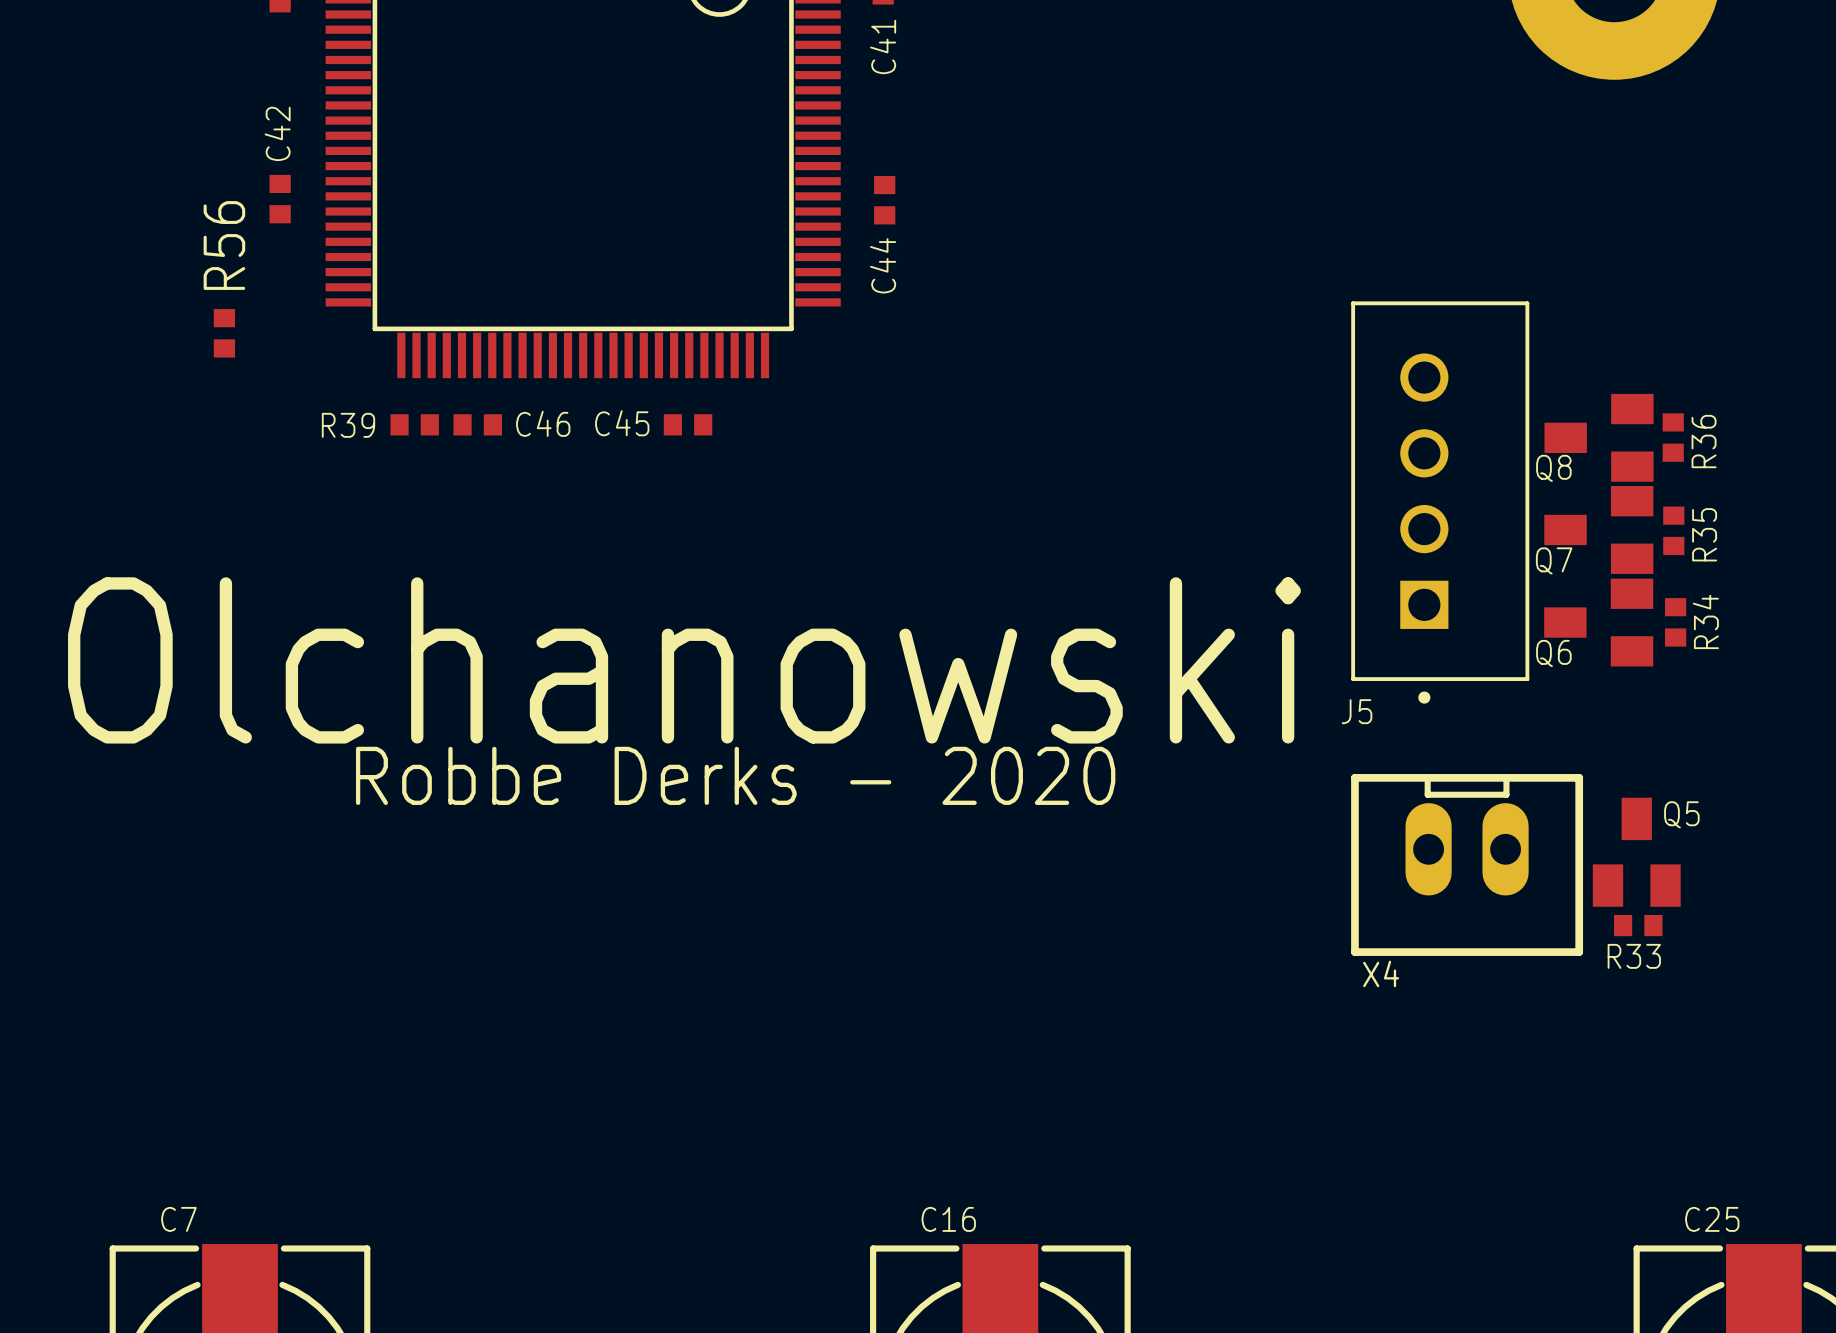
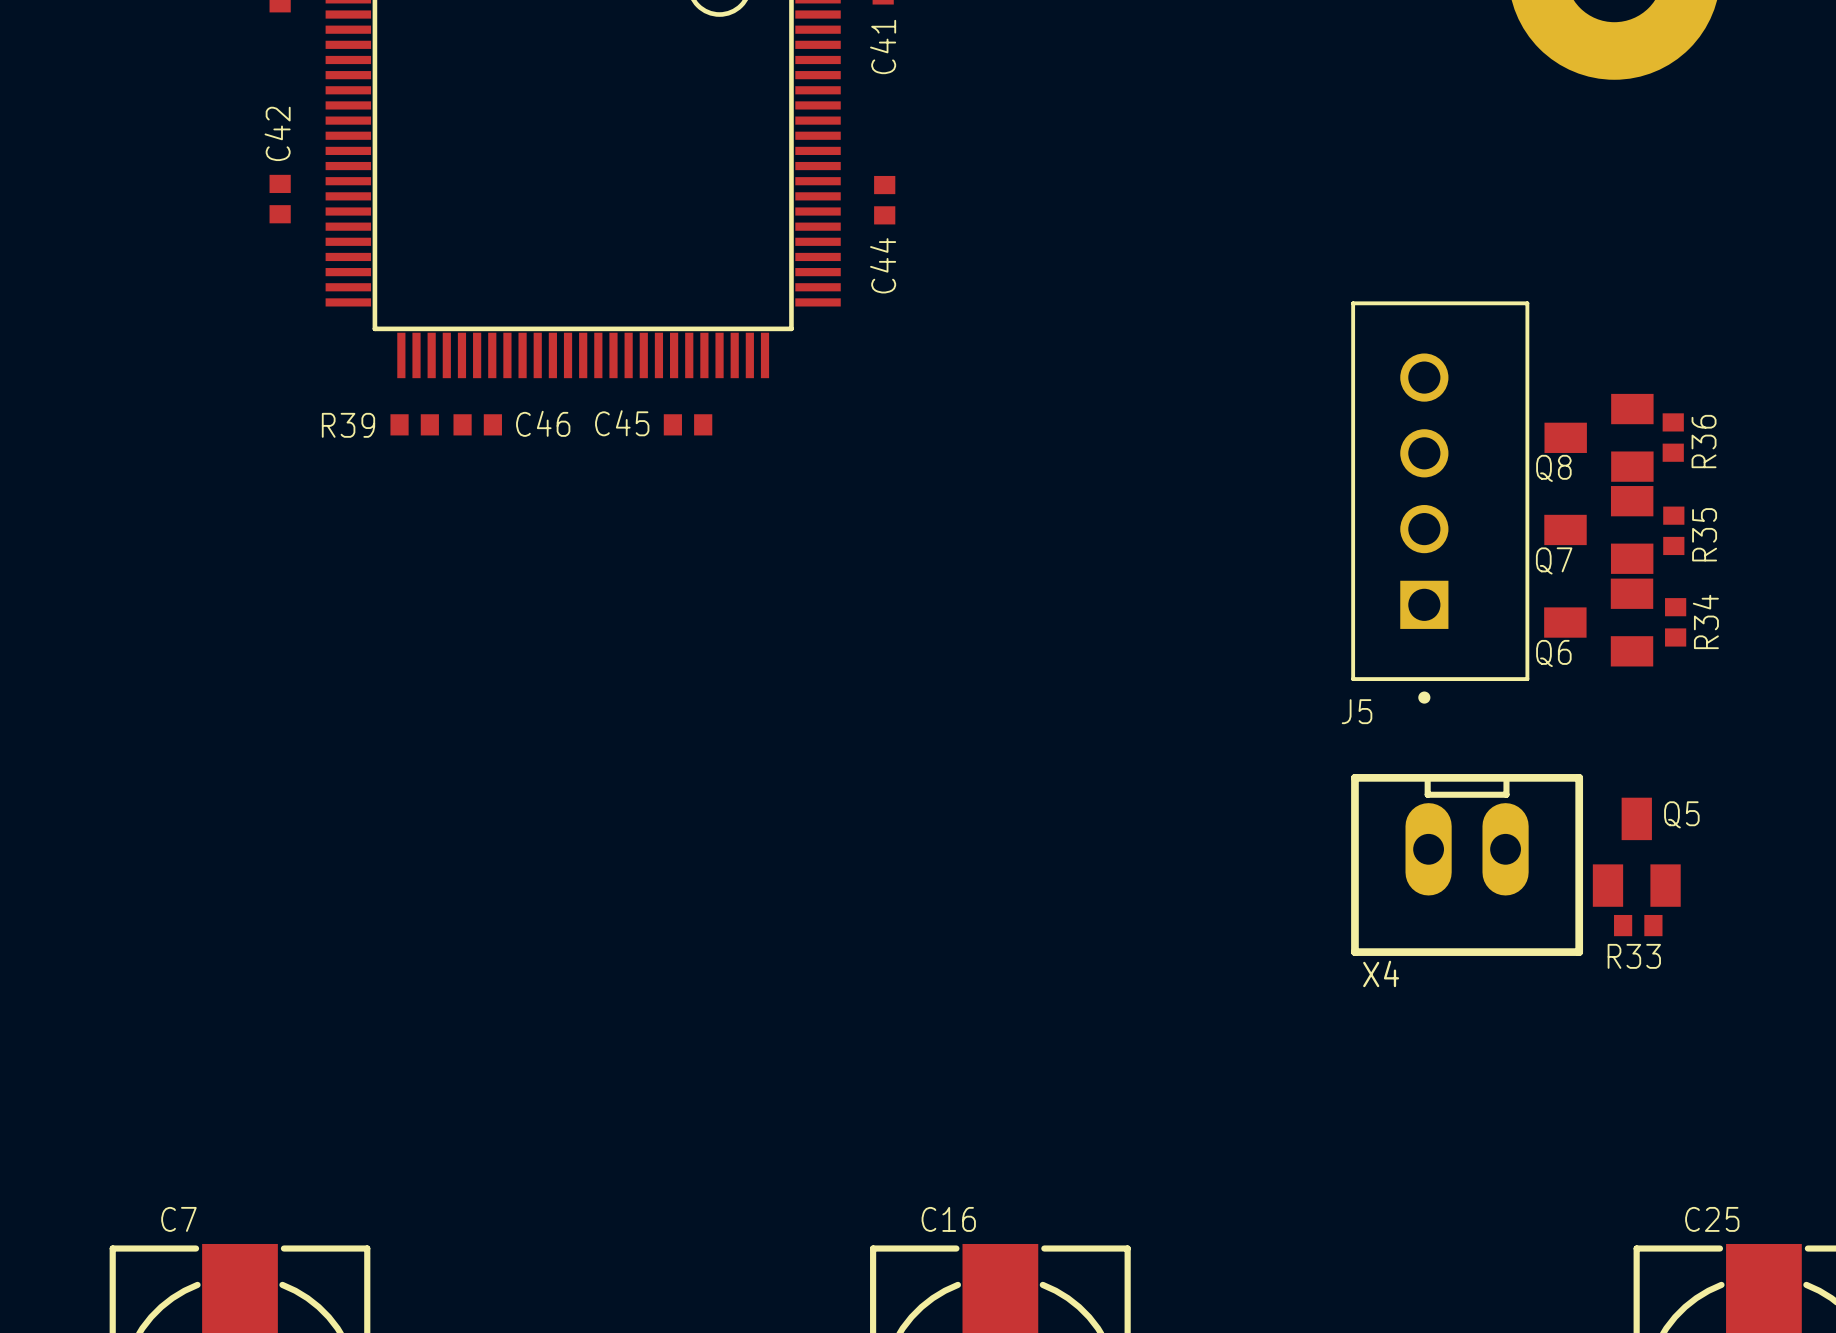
R56: (224, 333) -> none
text: Olchanowski (684, 660) -> none
text: Robbe Derks - 2020 (735, 775) -> none

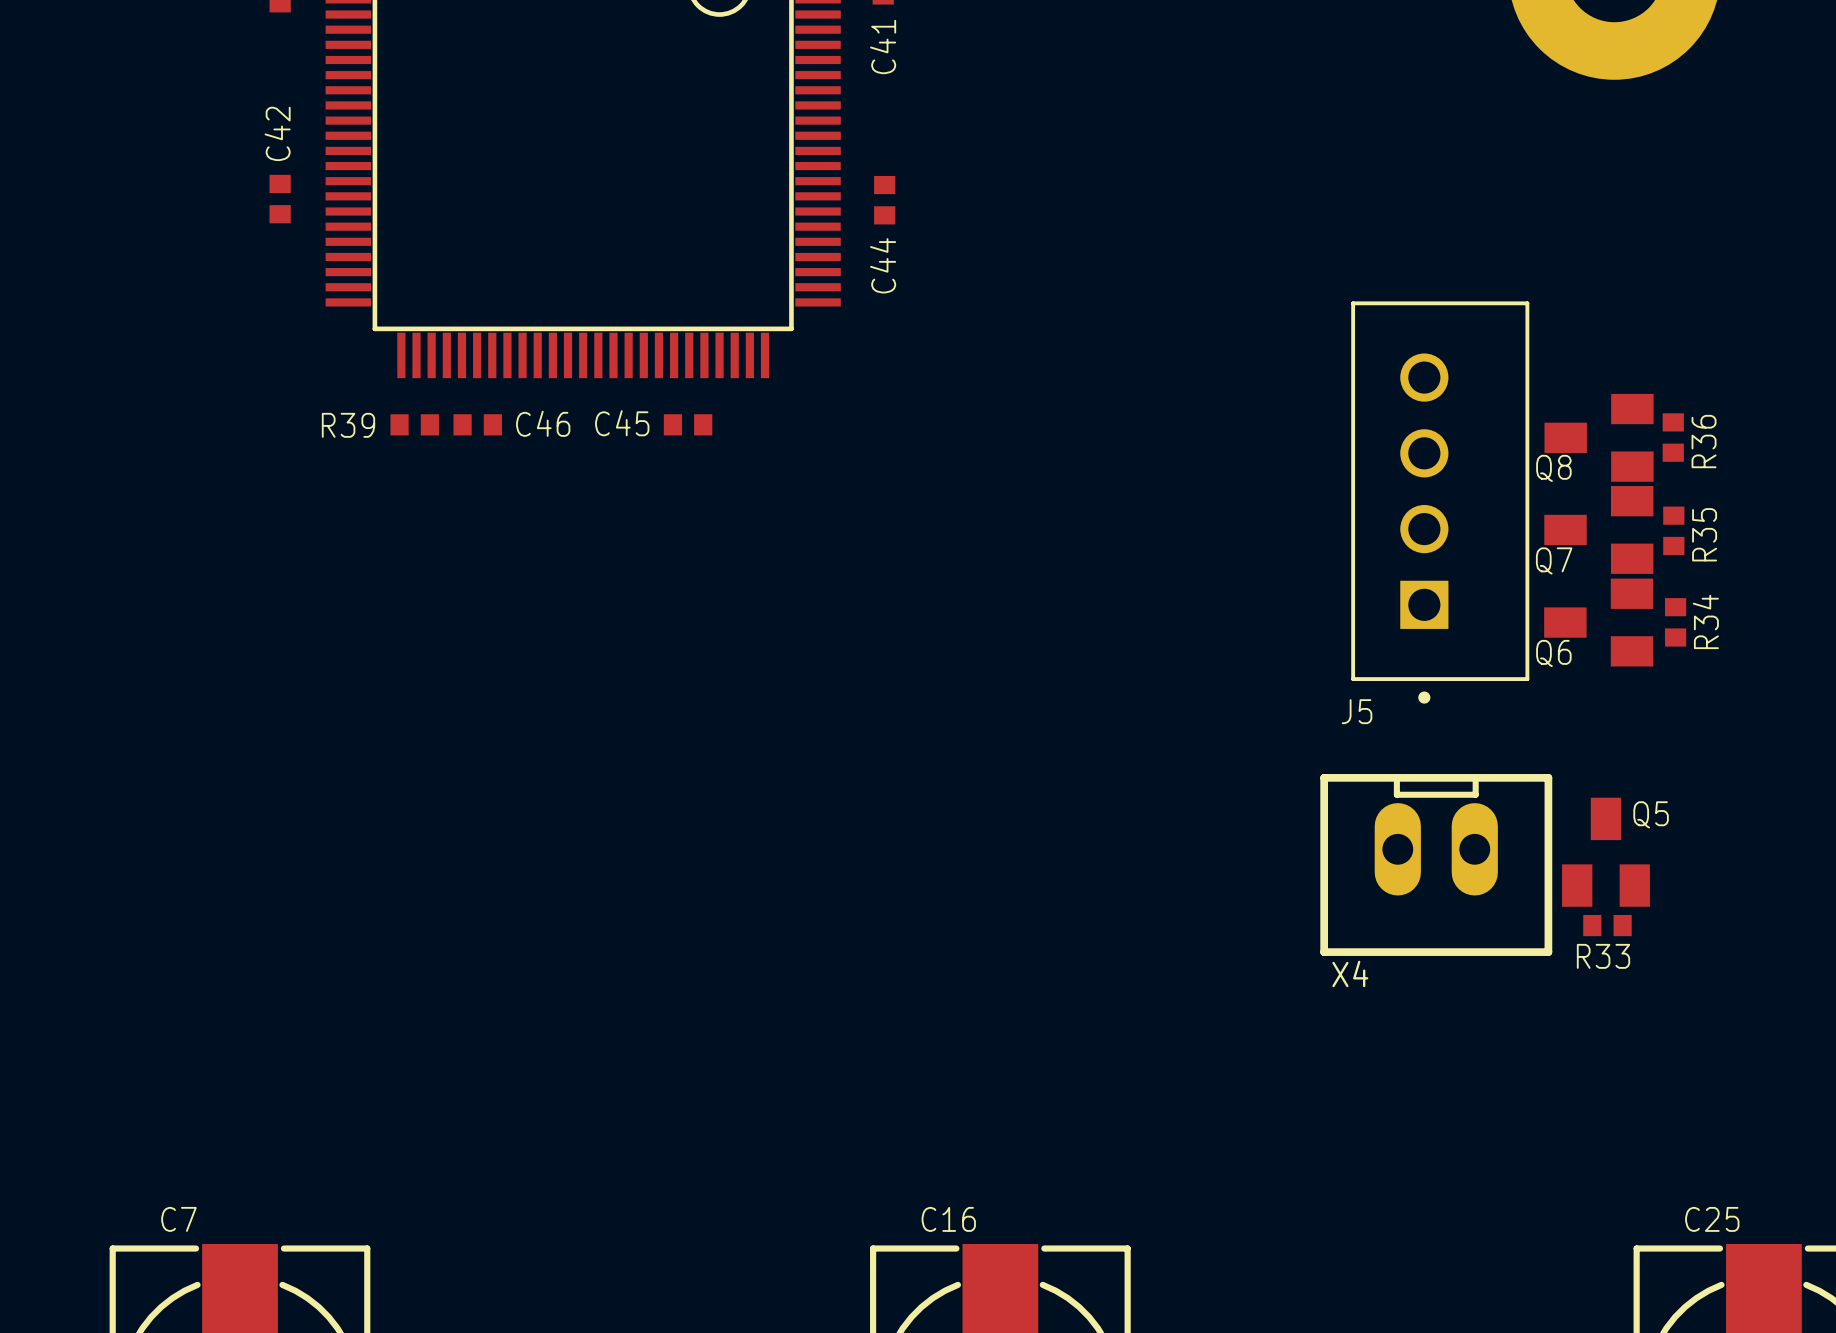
Q5 position: (1636, 852) -> (1605, 852)
X4 position: (1467, 864) -> (1436, 864)
R33 position: (1638, 925) -> (1607, 925)

